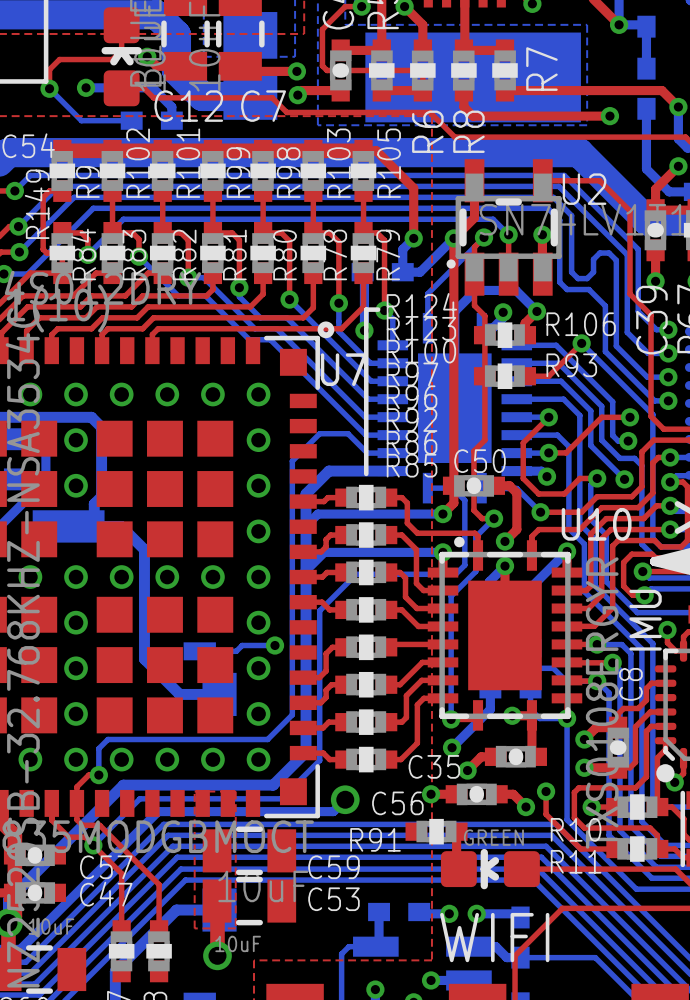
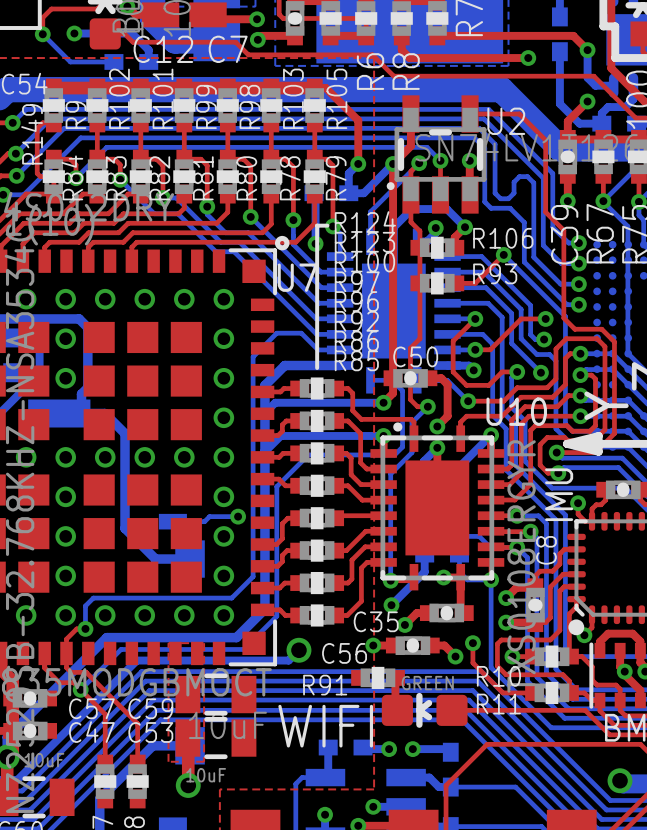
C59 name position: C59 (333, 867) -> C59 (150, 708)
C53 name position: C53 (333, 899) -> C53 (150, 732)
WIFI name position: WIFI (494, 937) -> WIFI (325, 726)

